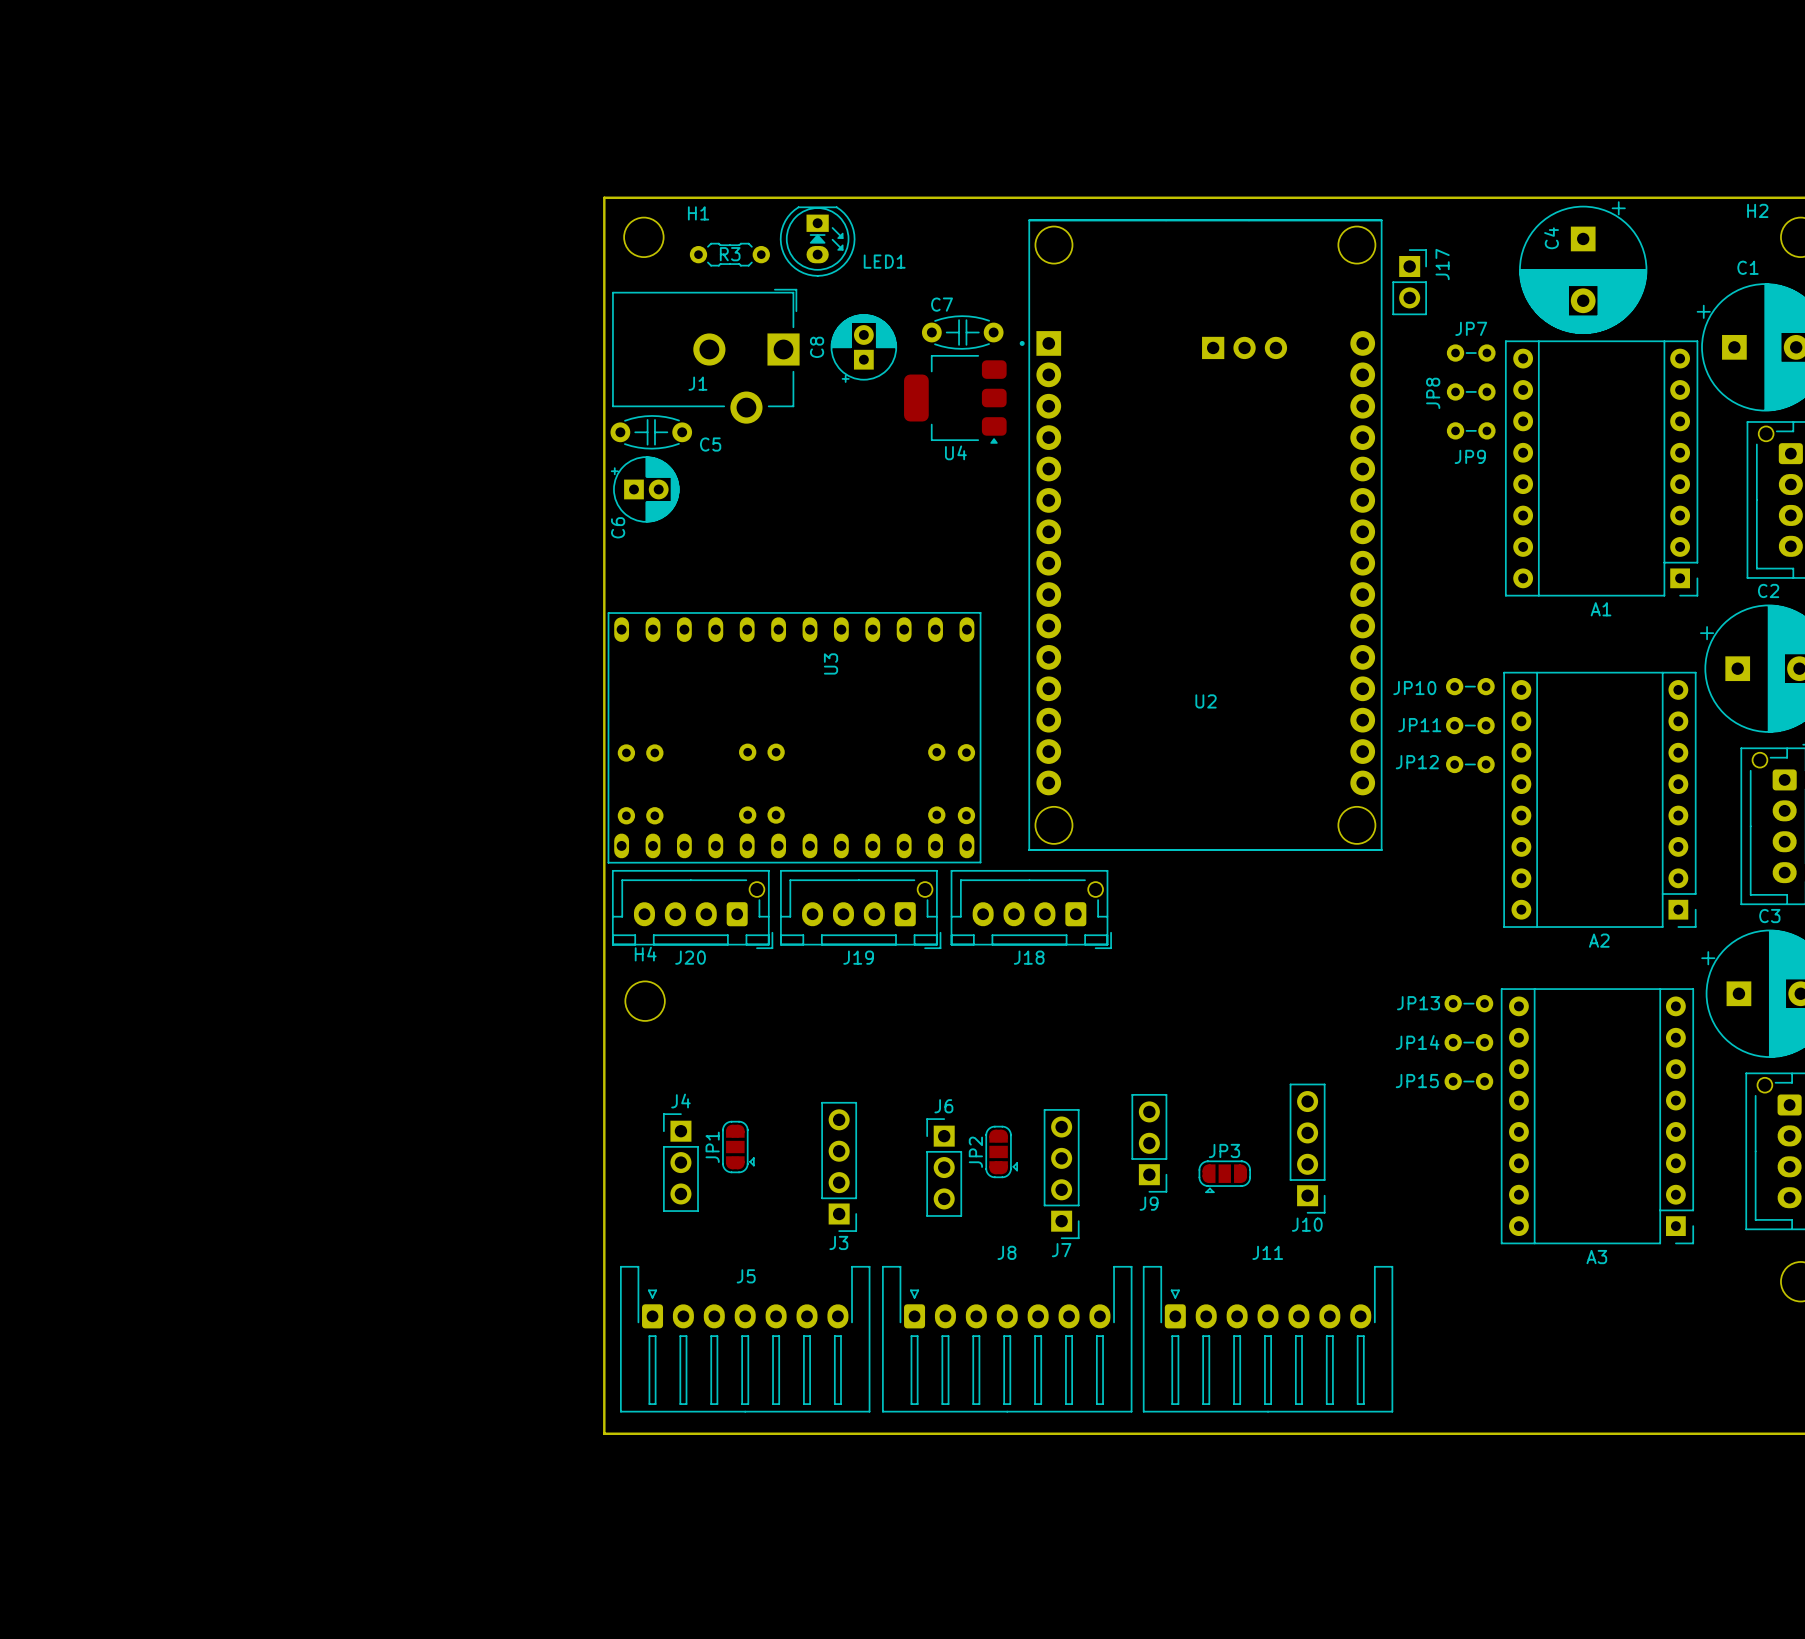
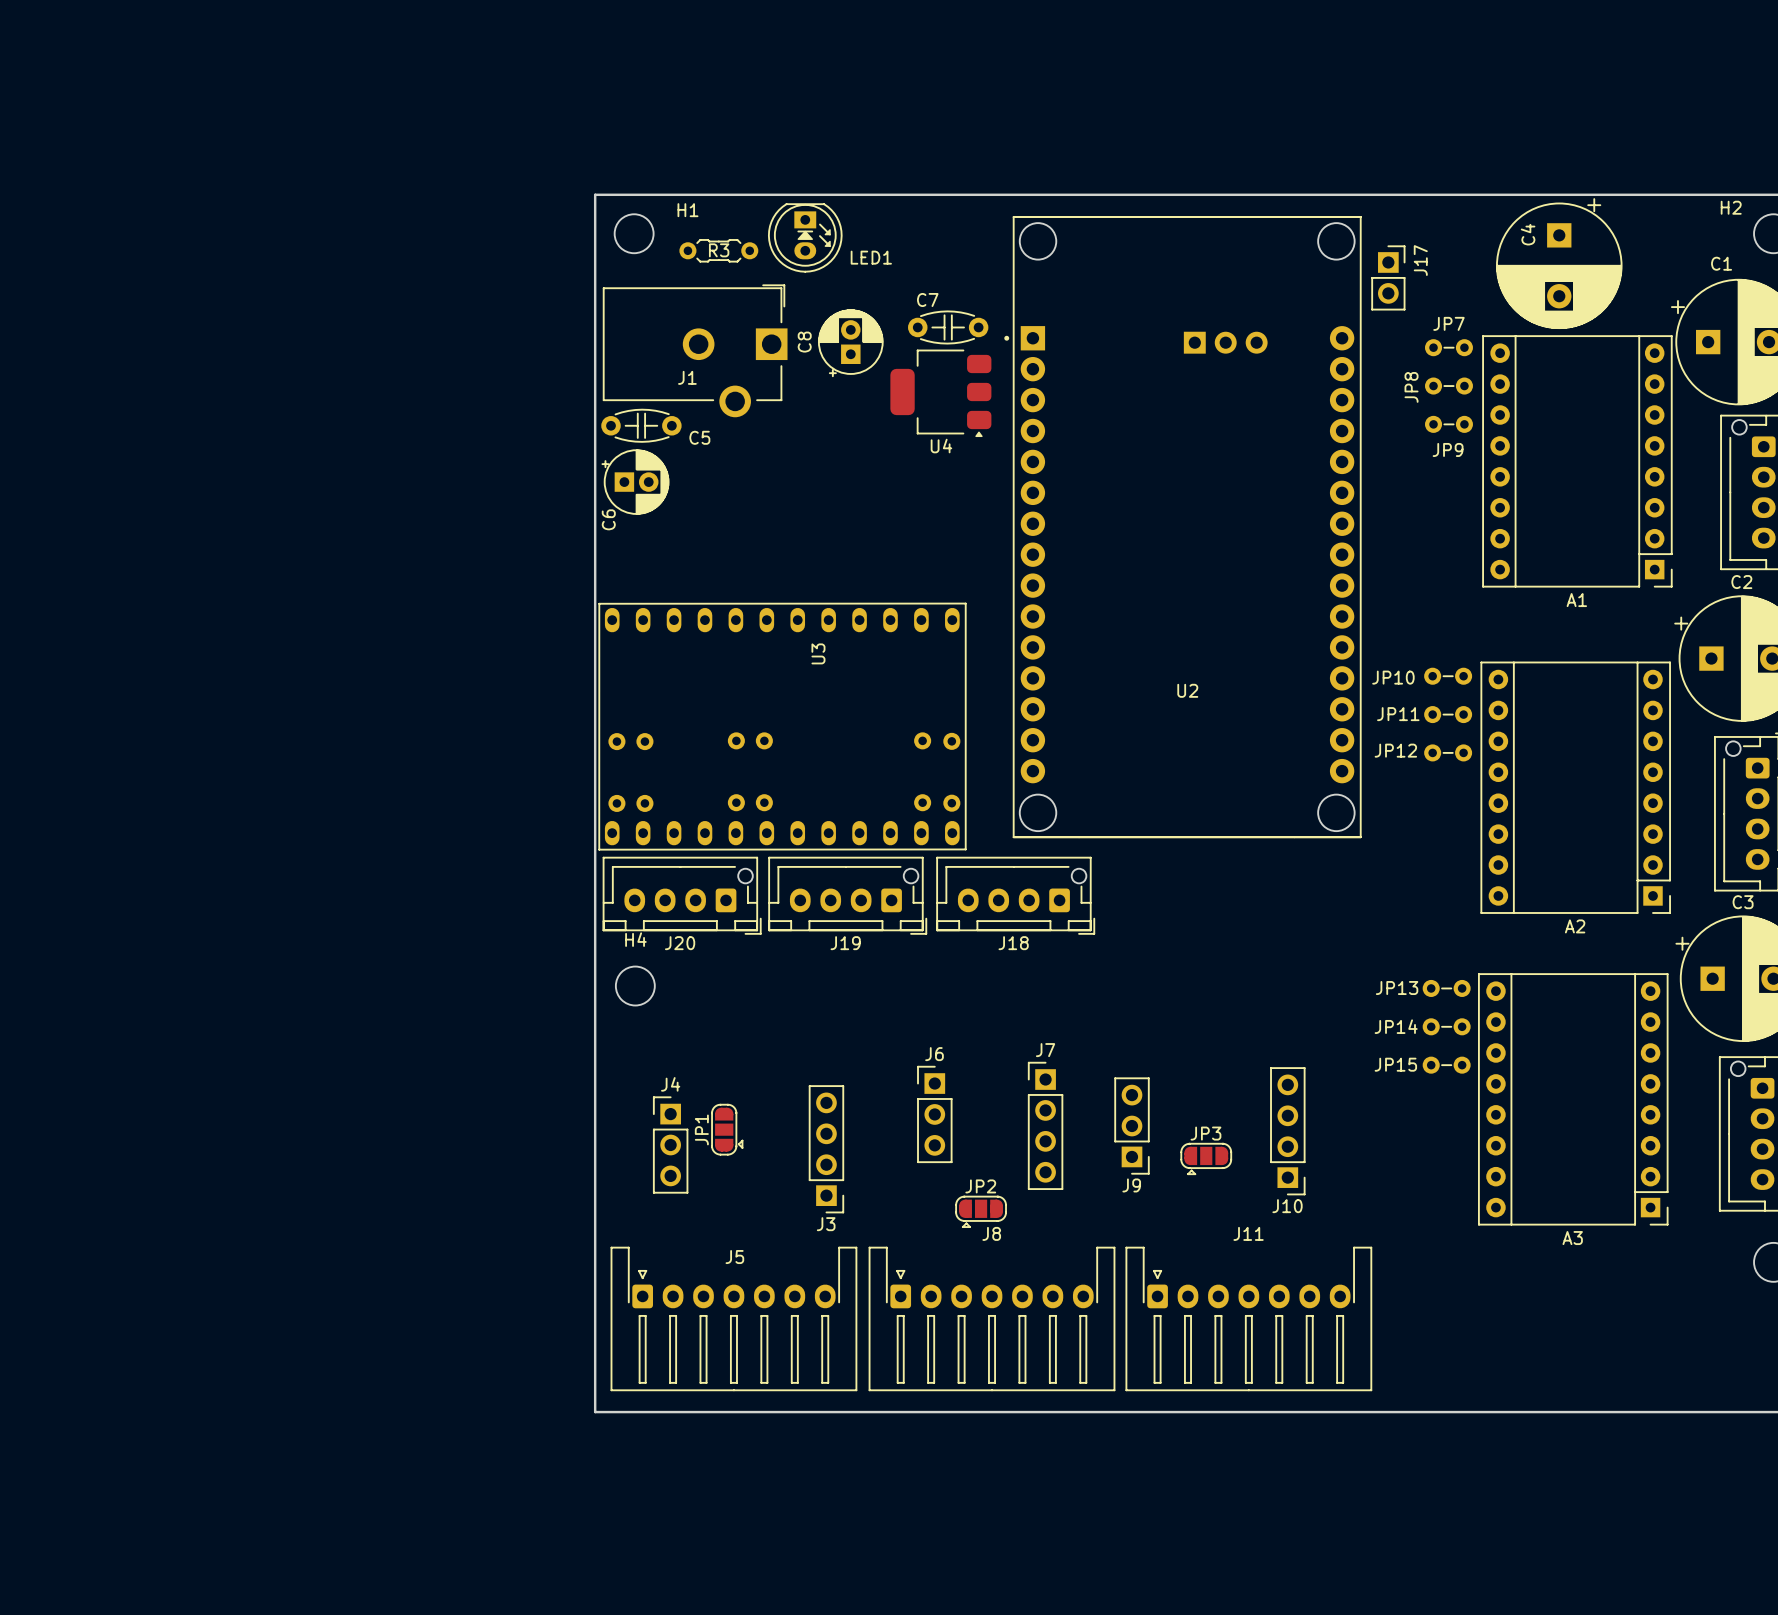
JP2 rotation: 0° (1001, 1151) -> 90° clockwise (981, 1211)
JP2 position: (1001, 1151) -> (981, 1211)
J6 position: (944, 1167) -> (934, 1114)
J7 rotation: 0° (1061, 1174) -> 180° (1045, 1125)

